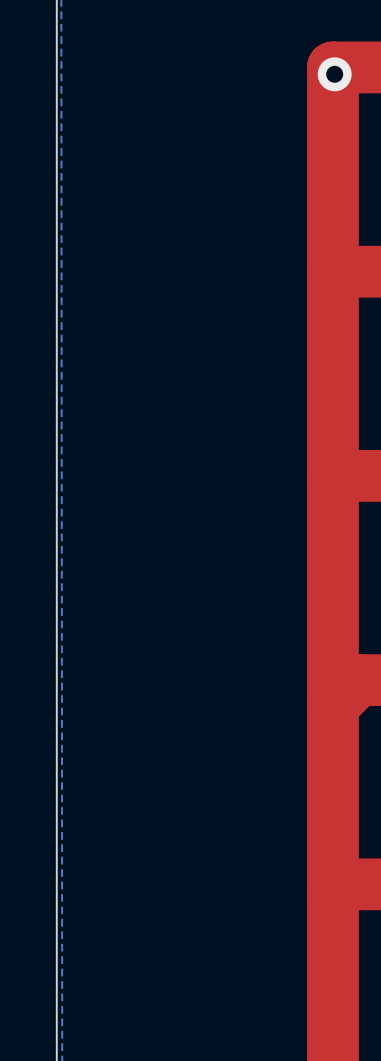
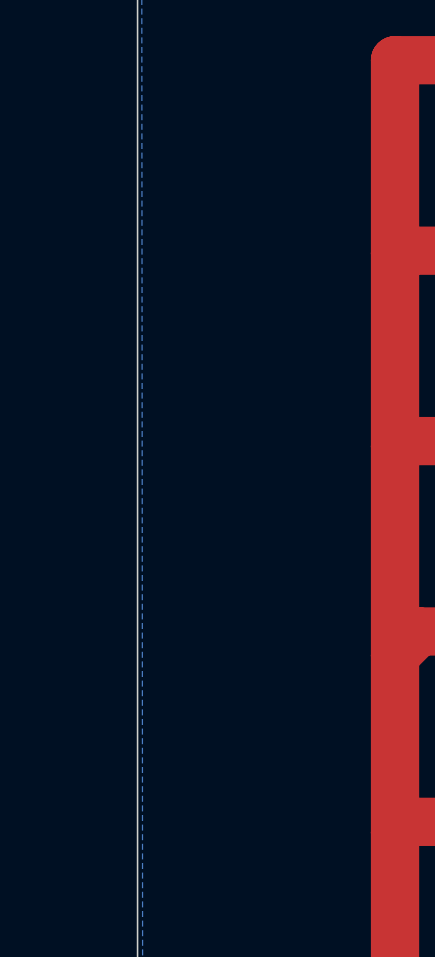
via: (334, 74) -> none

